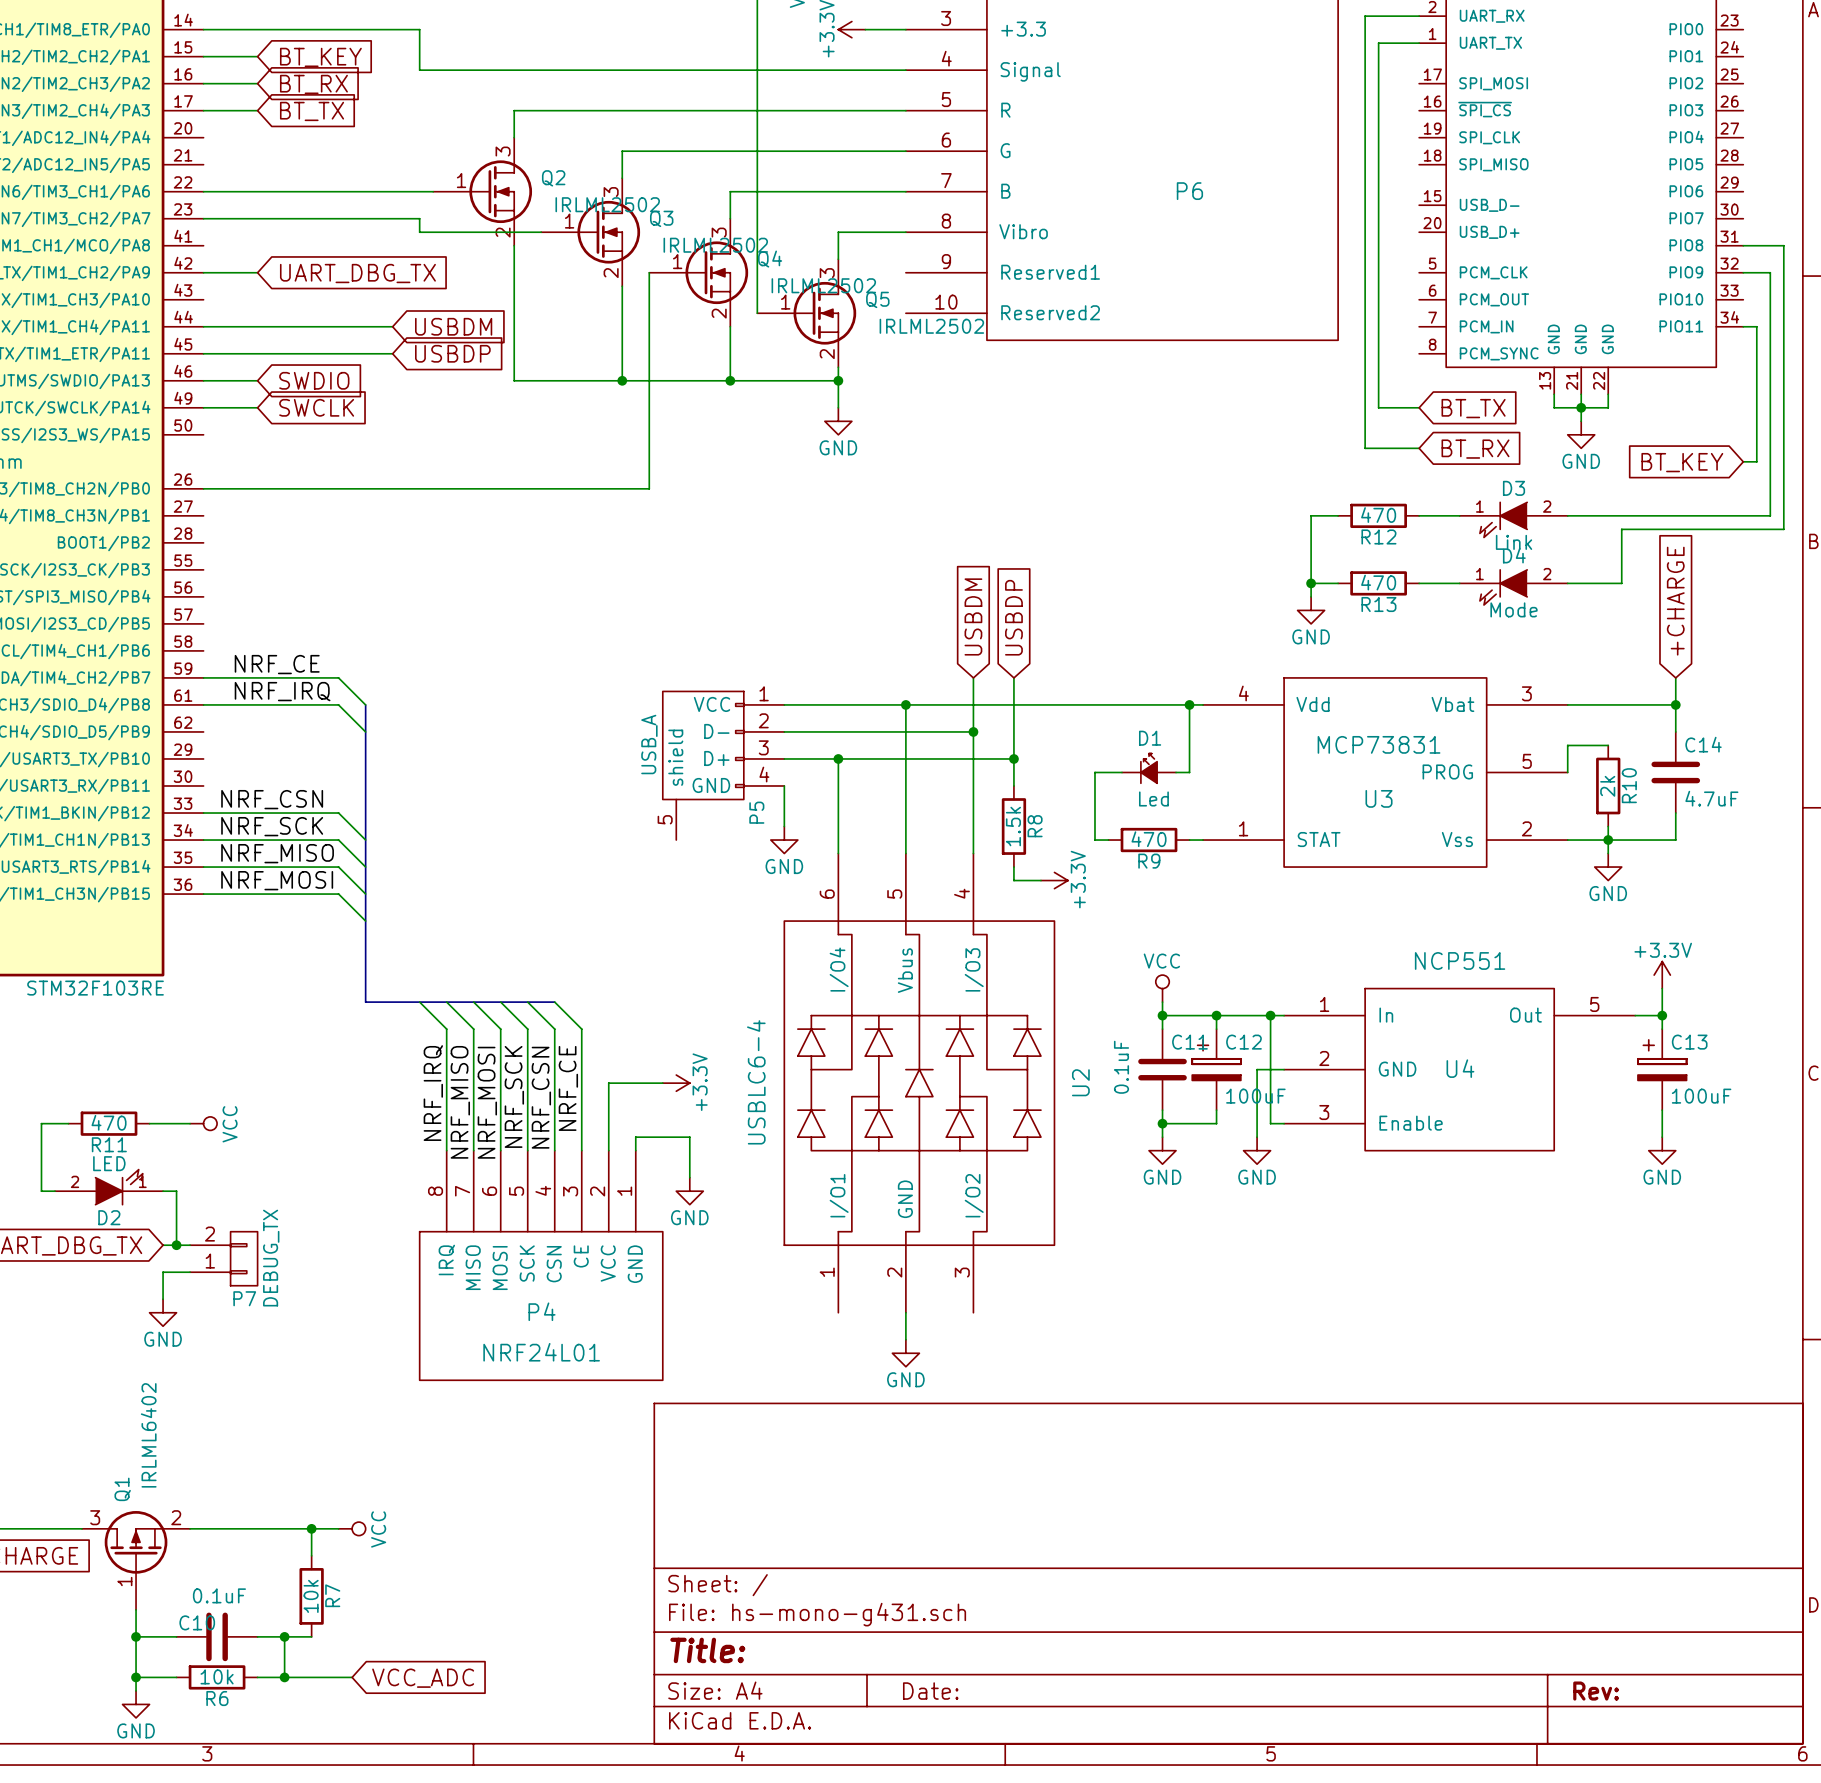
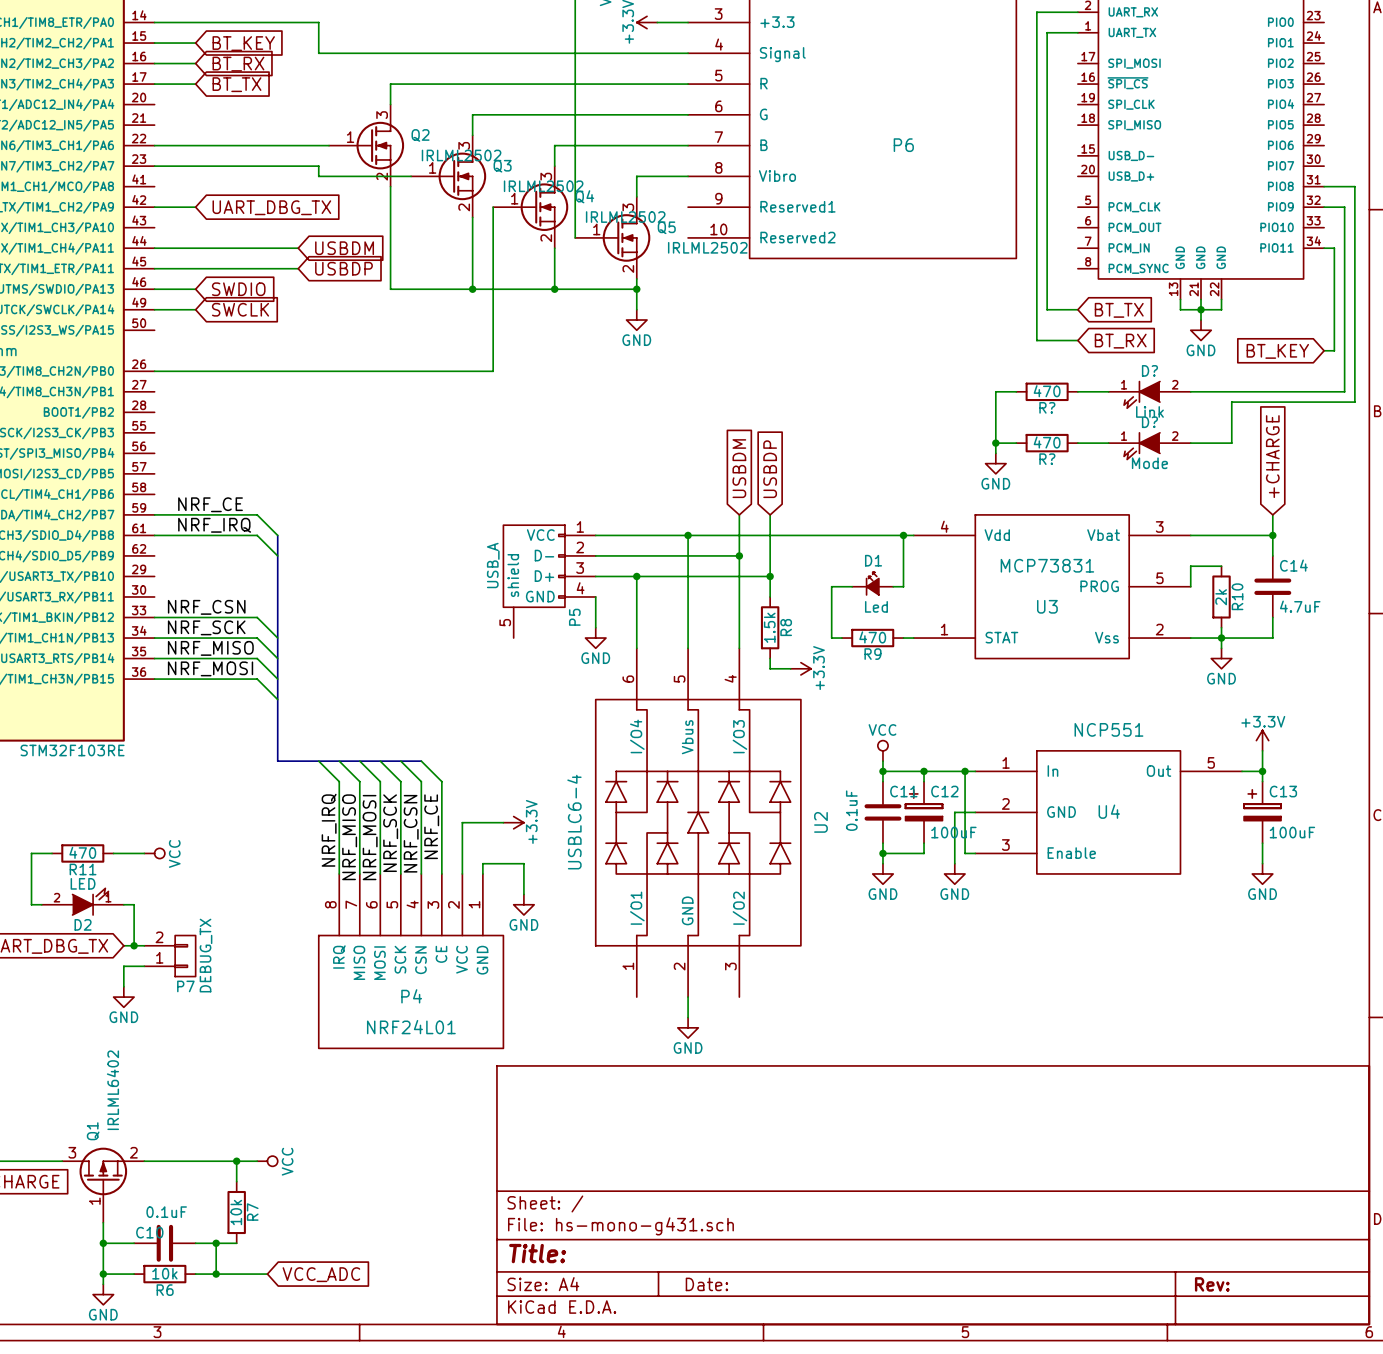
D3 name: D3 (1514, 488) -> D? (1149, 370)
R12 name: R12 (1378, 536) -> R? (1047, 407)
D4 name: D4 (1514, 555) -> D? (1149, 422)
R13 name: R13 (1378, 604) -> R? (1047, 459)

